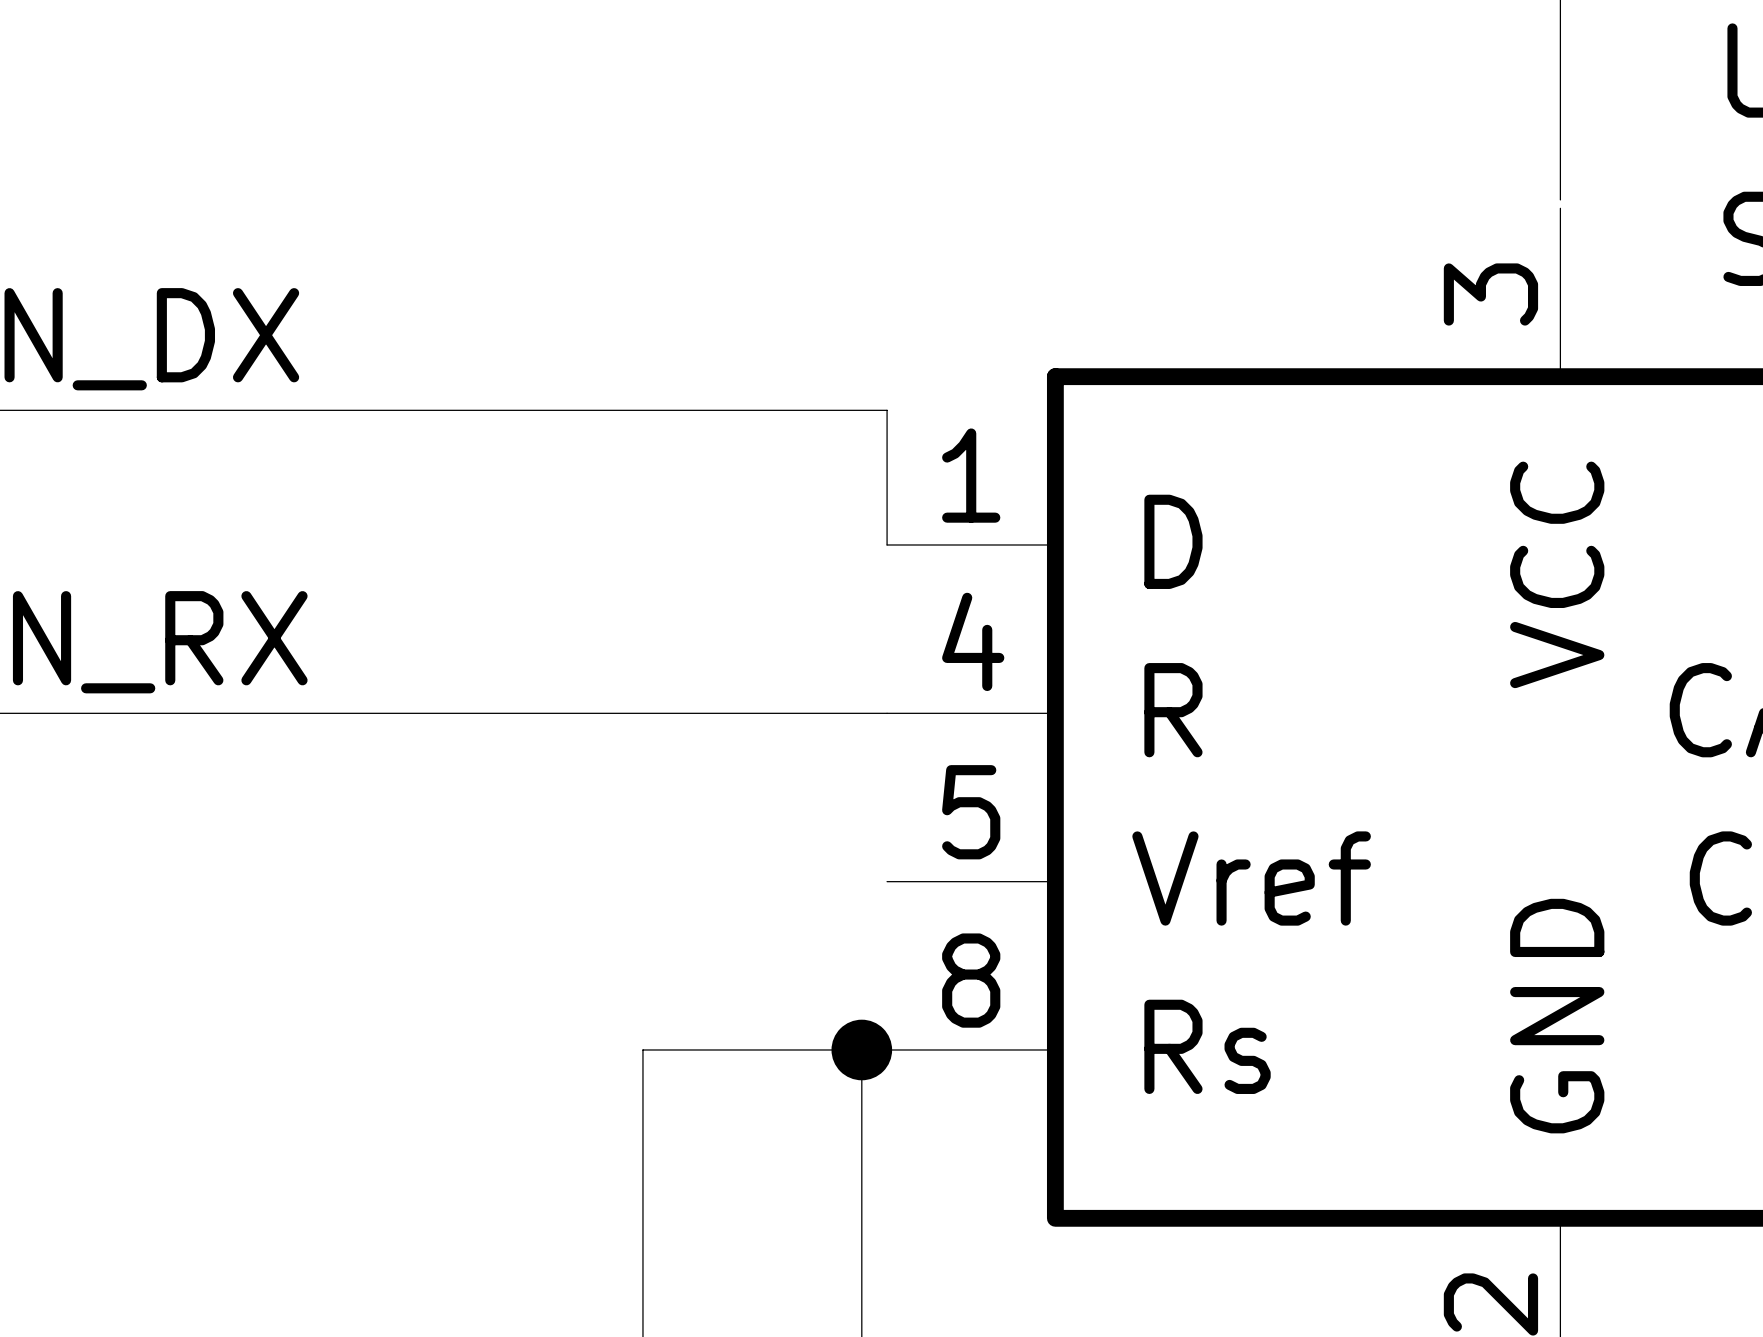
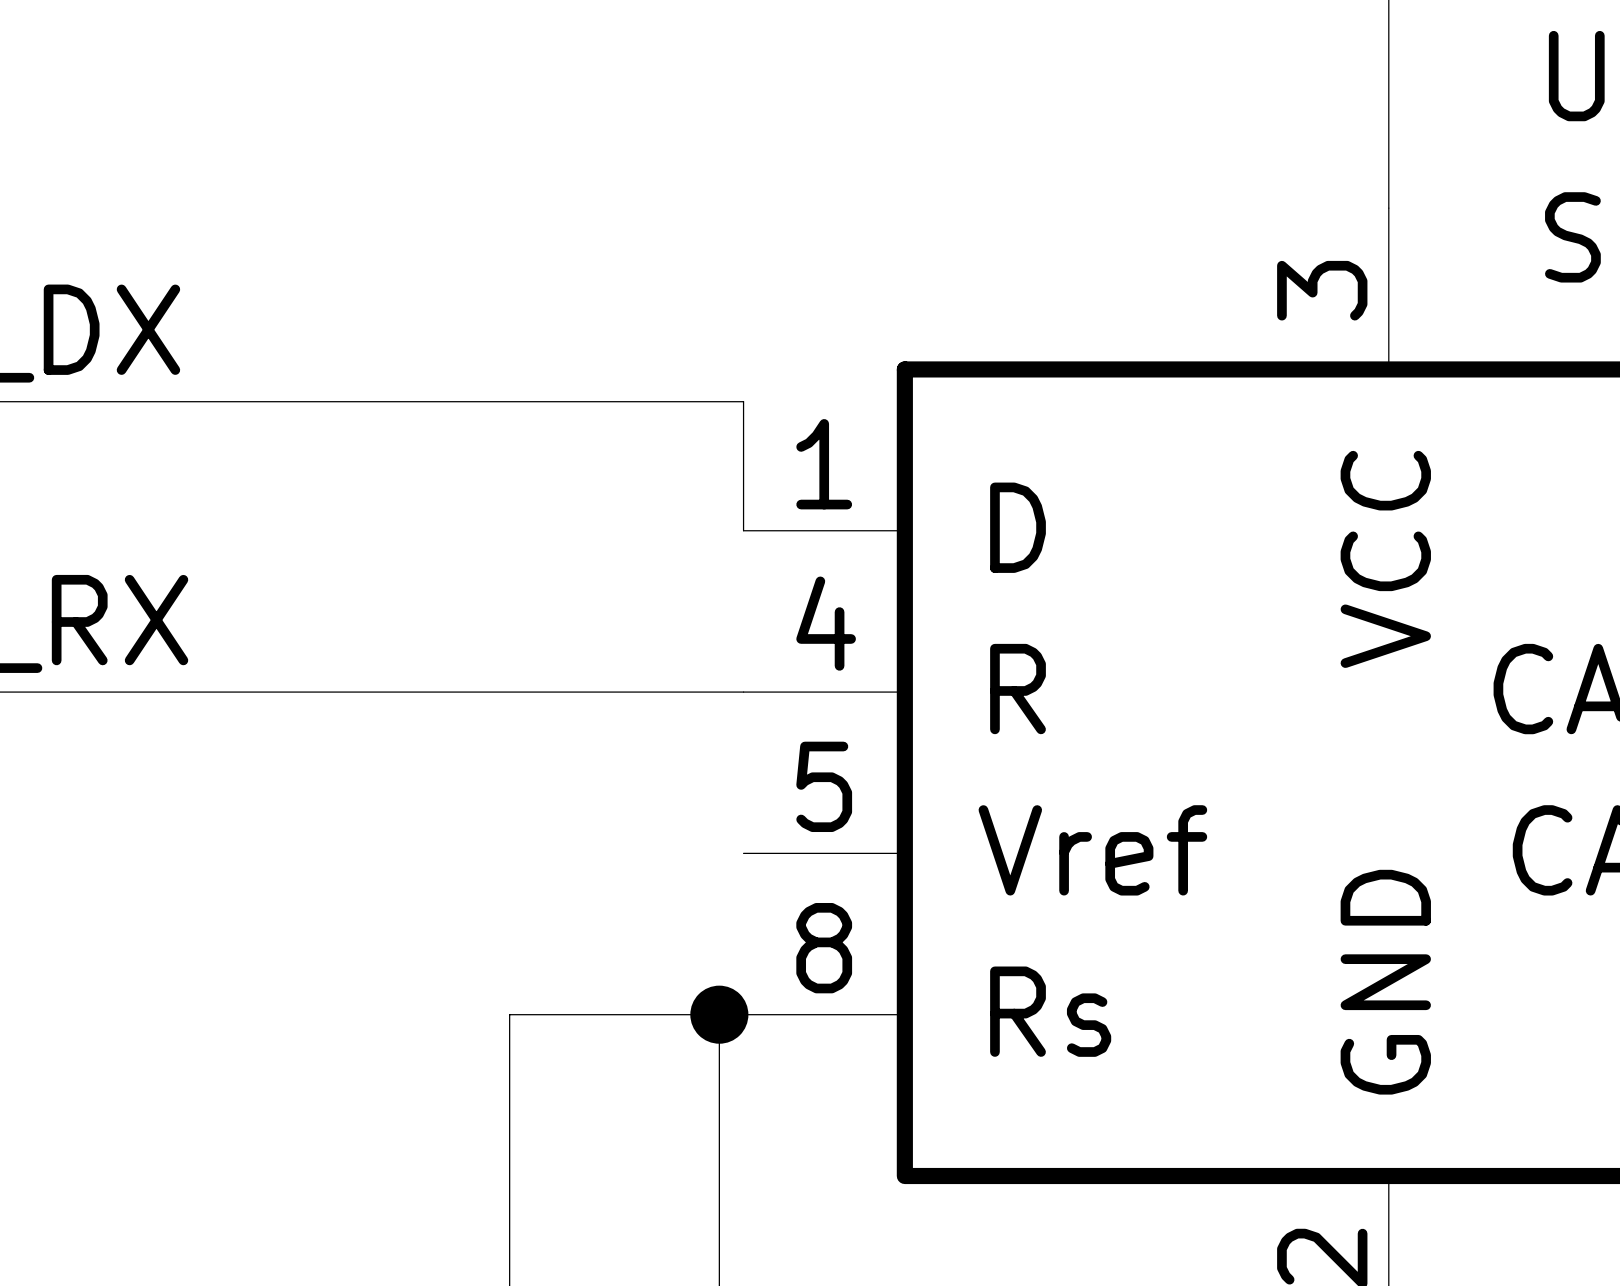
wire: none -> (1388, 200) (1388, 208)

